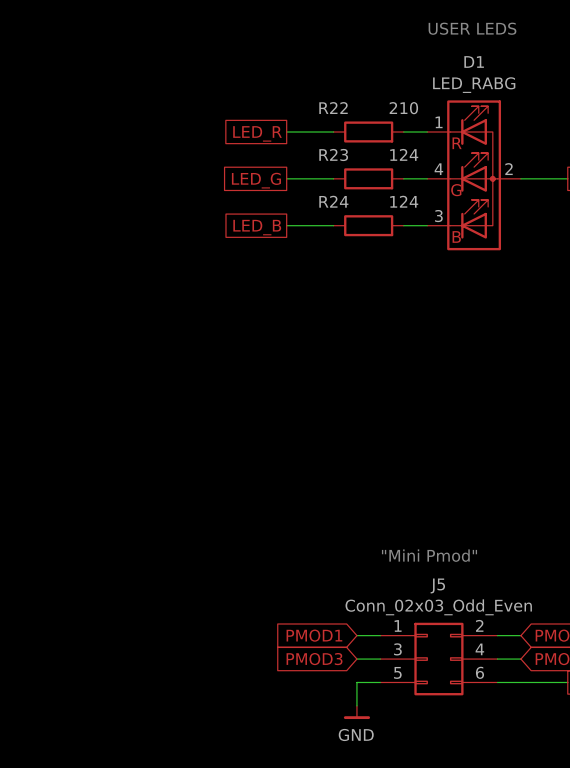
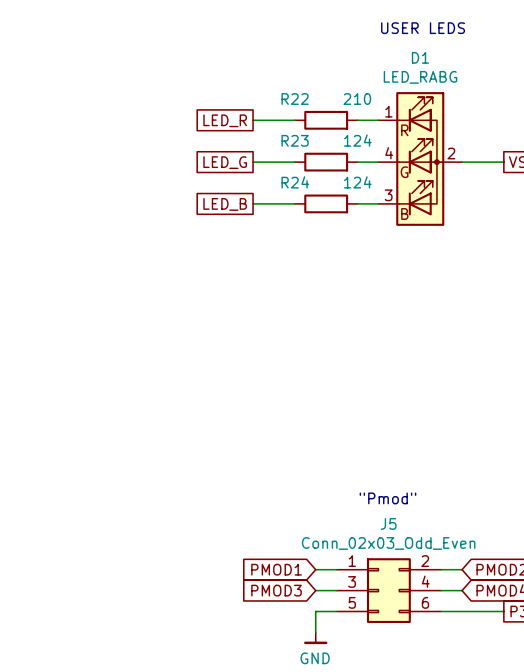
text: "Mini Pmod" (429, 555) -> "Pmod" (387, 498)

